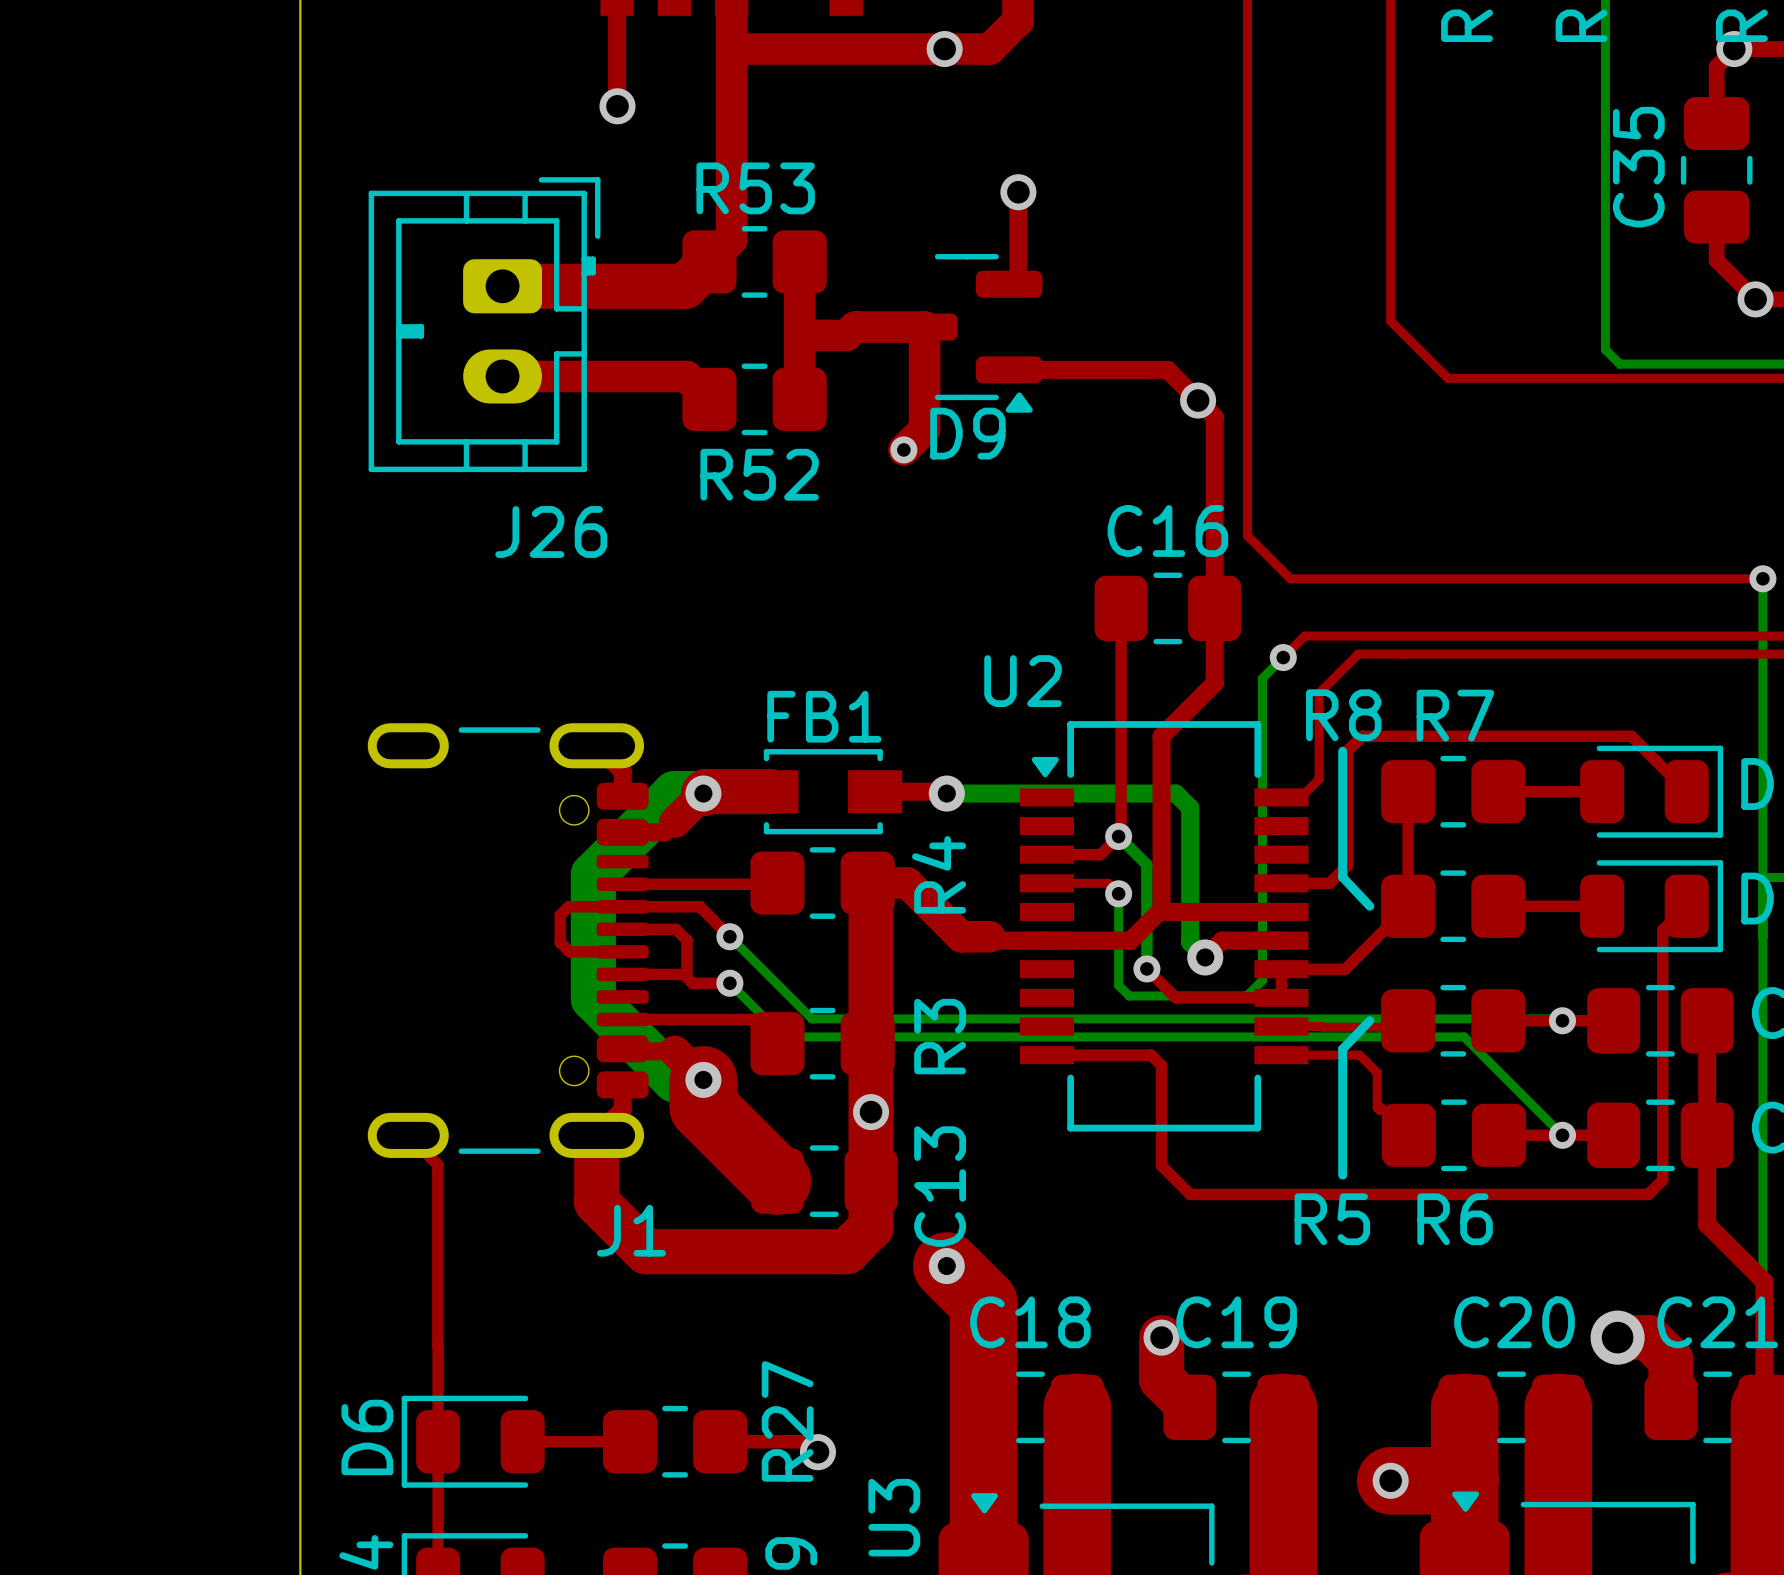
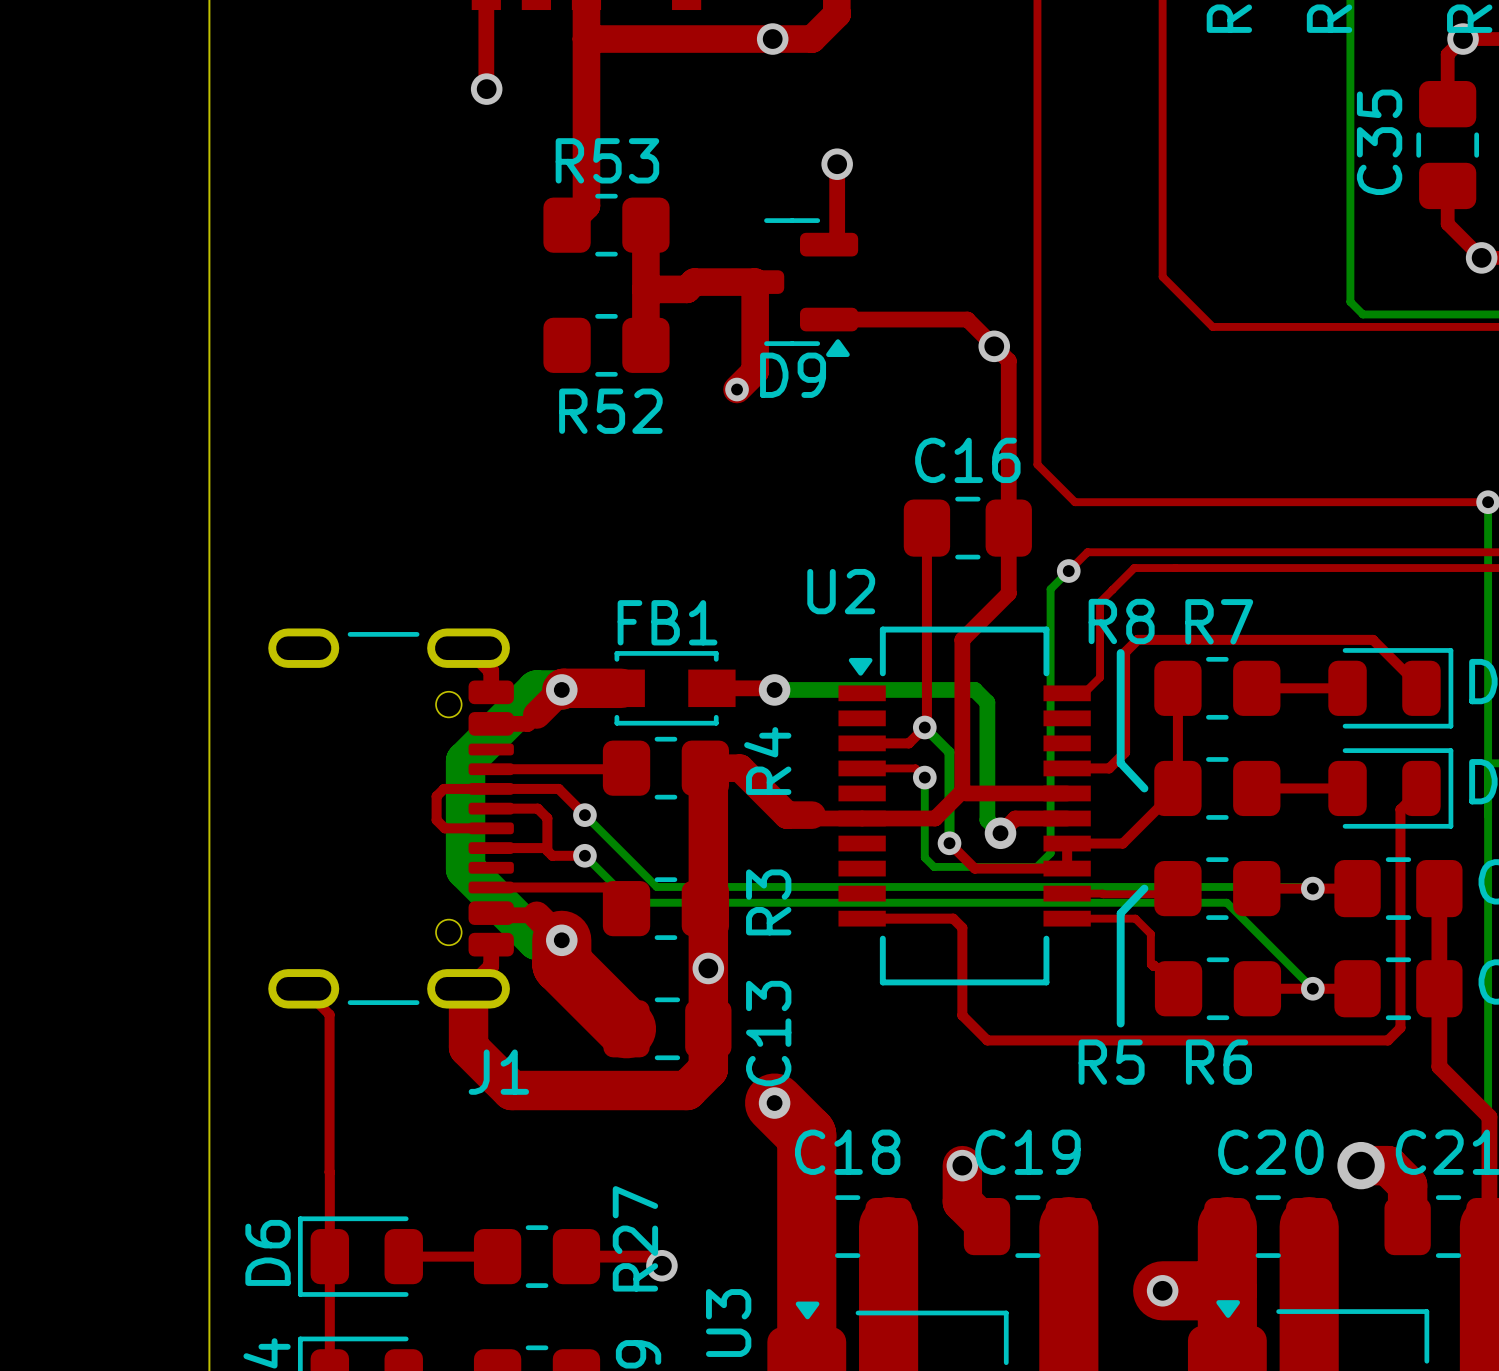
top track: (709, 261) (685, 286) (502, 286) -> none
J26: (484, 324) -> none
top track: (502, 376) (686, 376) (709, 399) -> none

